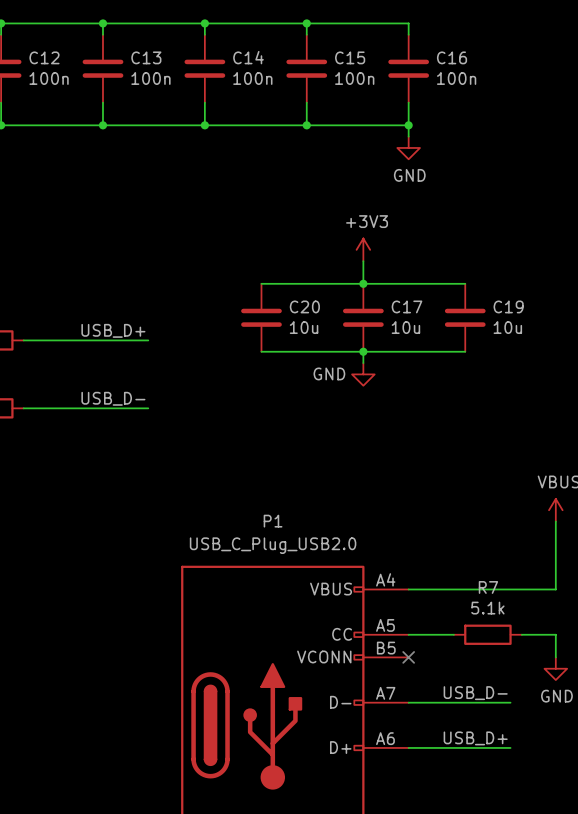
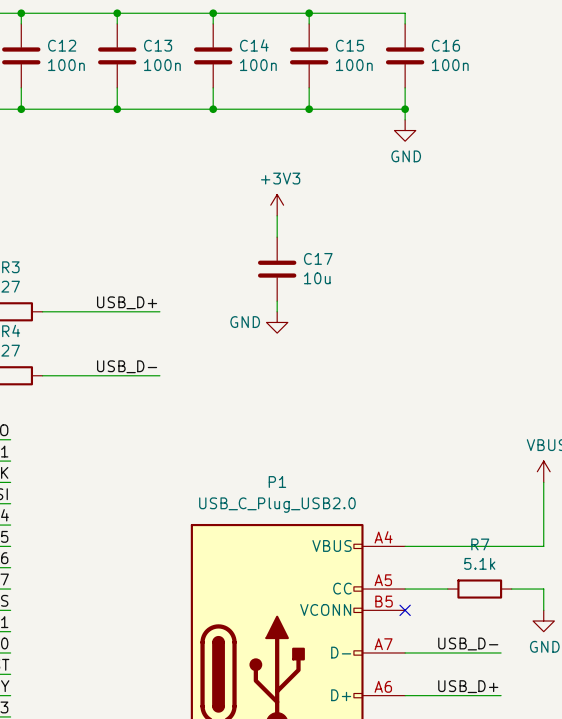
power symbol position: +3V3 (363, 249) -> +3V3 (277, 205)
wire: (363, 261) (363, 283) -> (277, 215) (277, 237)
wire: (261, 283) (465, 283) -> none
junction: (363, 283) -> none
C20: 10u (261, 317) -> none
C17 position: (363, 317) -> (277, 269)
C19: 10u (465, 317) -> none
wire: (261, 351) (465, 351) -> none
wire: (363, 351) (363, 363) -> (277, 301) (277, 311)
junction: (363, 351) -> none
power symbol position: GND (363, 374) -> GND (277, 322)

